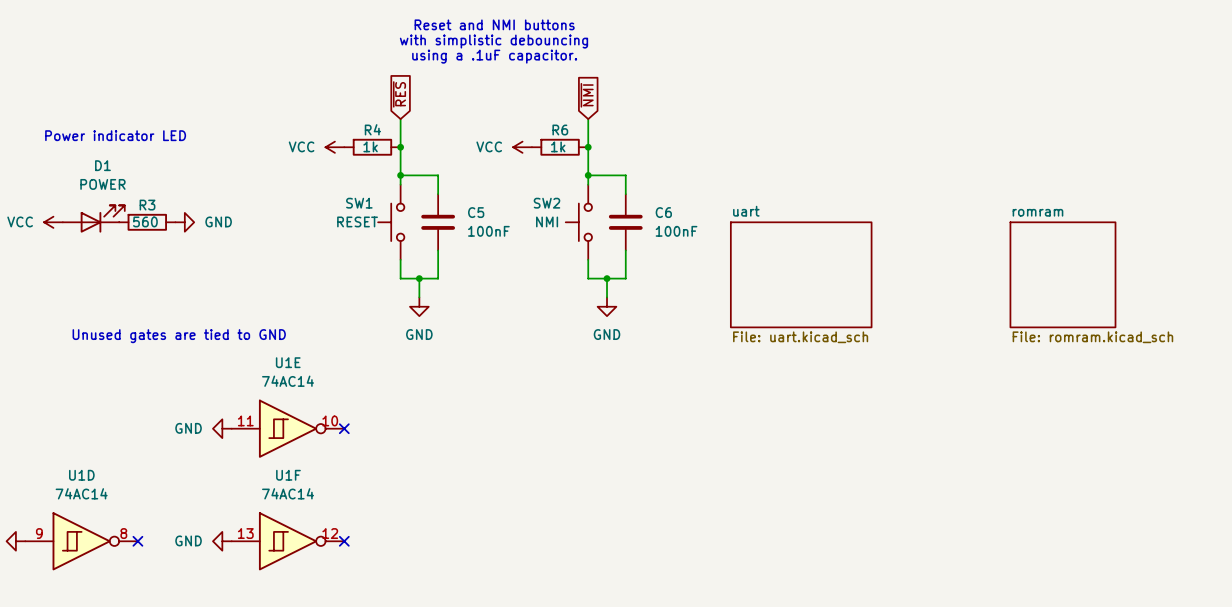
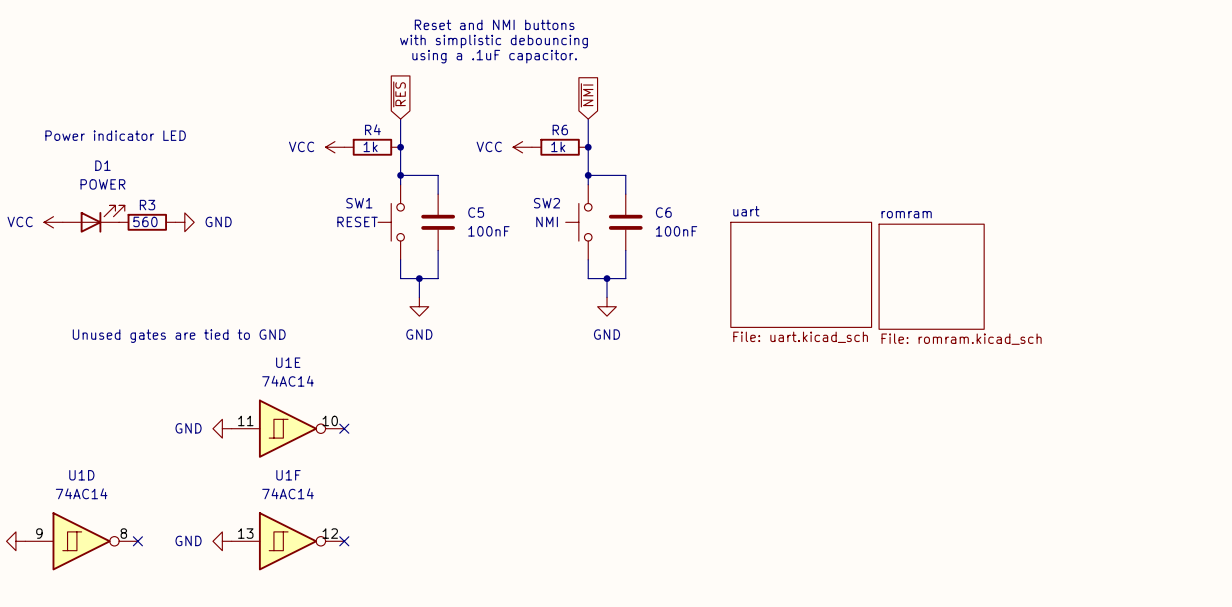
sheet romram position: (1062, 274) -> (931, 276)

